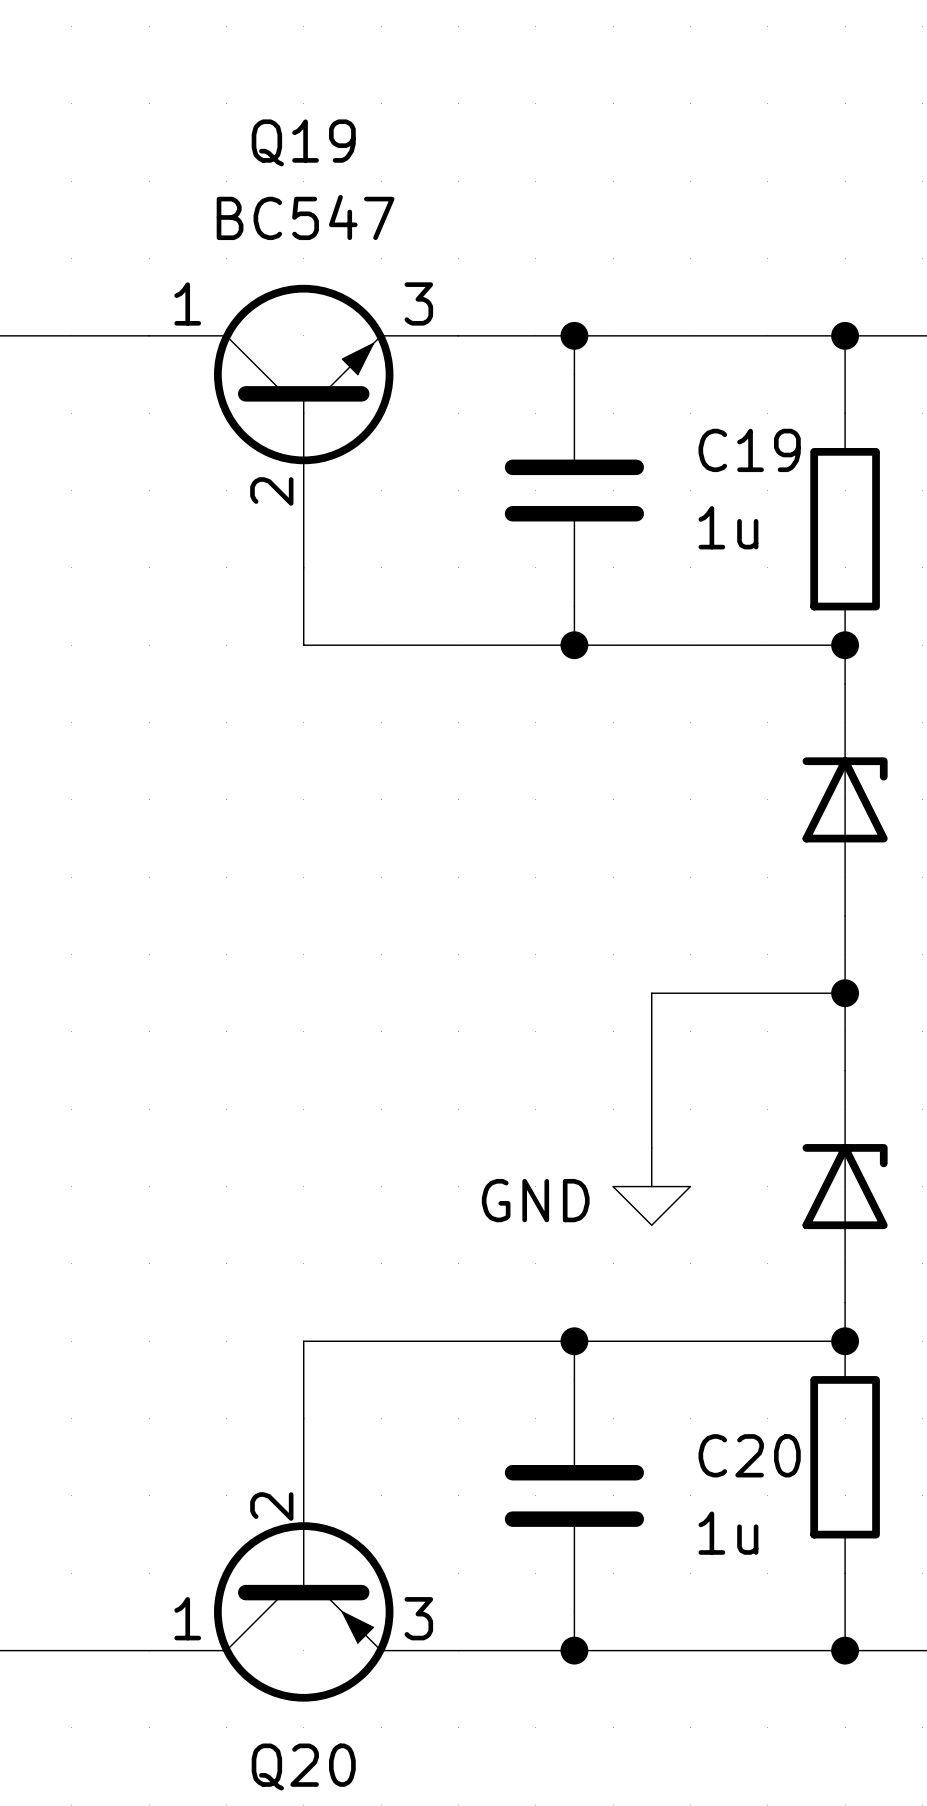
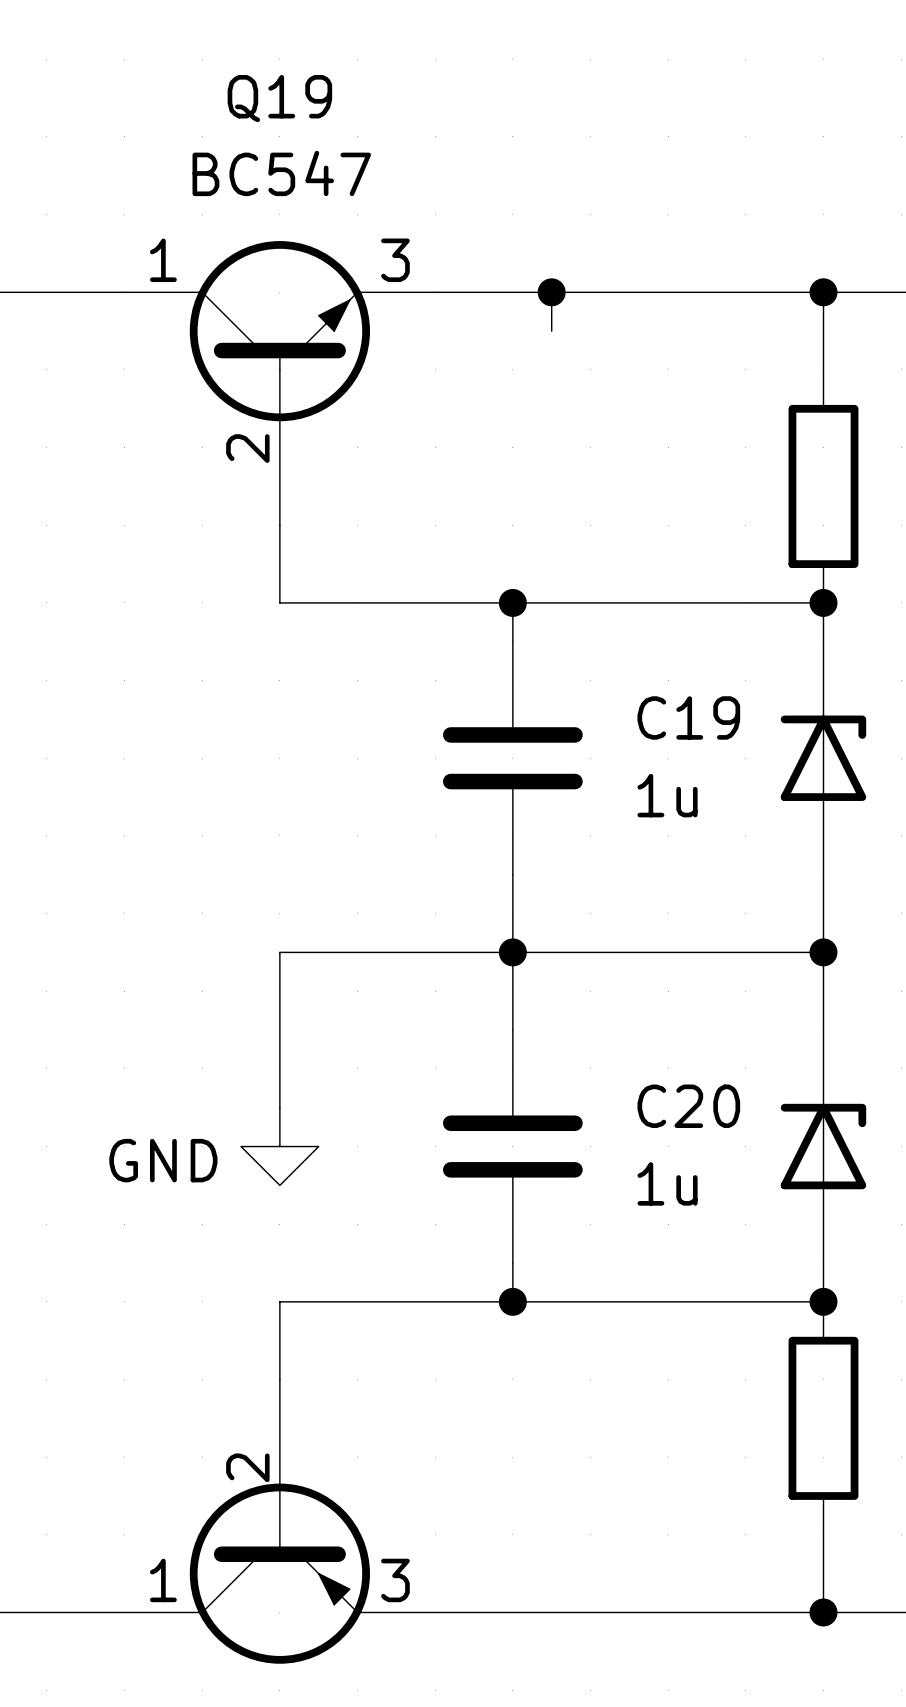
C19 position: (574, 490) -> (512, 758)
wire: (574, 606) (574, 645) -> (512, 602) (512, 641)
junction position: (574, 645) -> (512, 602)
wire: none -> (512, 874) (512, 1030)
junction: none -> (512, 952)
wire: (651, 993) (651, 1147) -> (629, 952) (279, 952) (279, 1107)
power symbol position: GND (651, 1186) -> GND (279, 1146)
wire: (574, 1341) (574, 1379) -> (512, 1263) (512, 1301)
junction position: (574, 1341) -> (512, 1301)
C20 position: (574, 1495) -> (512, 1146)
wire: (574, 1611) (574, 1650) -> none
junction: (574, 1650) -> none

